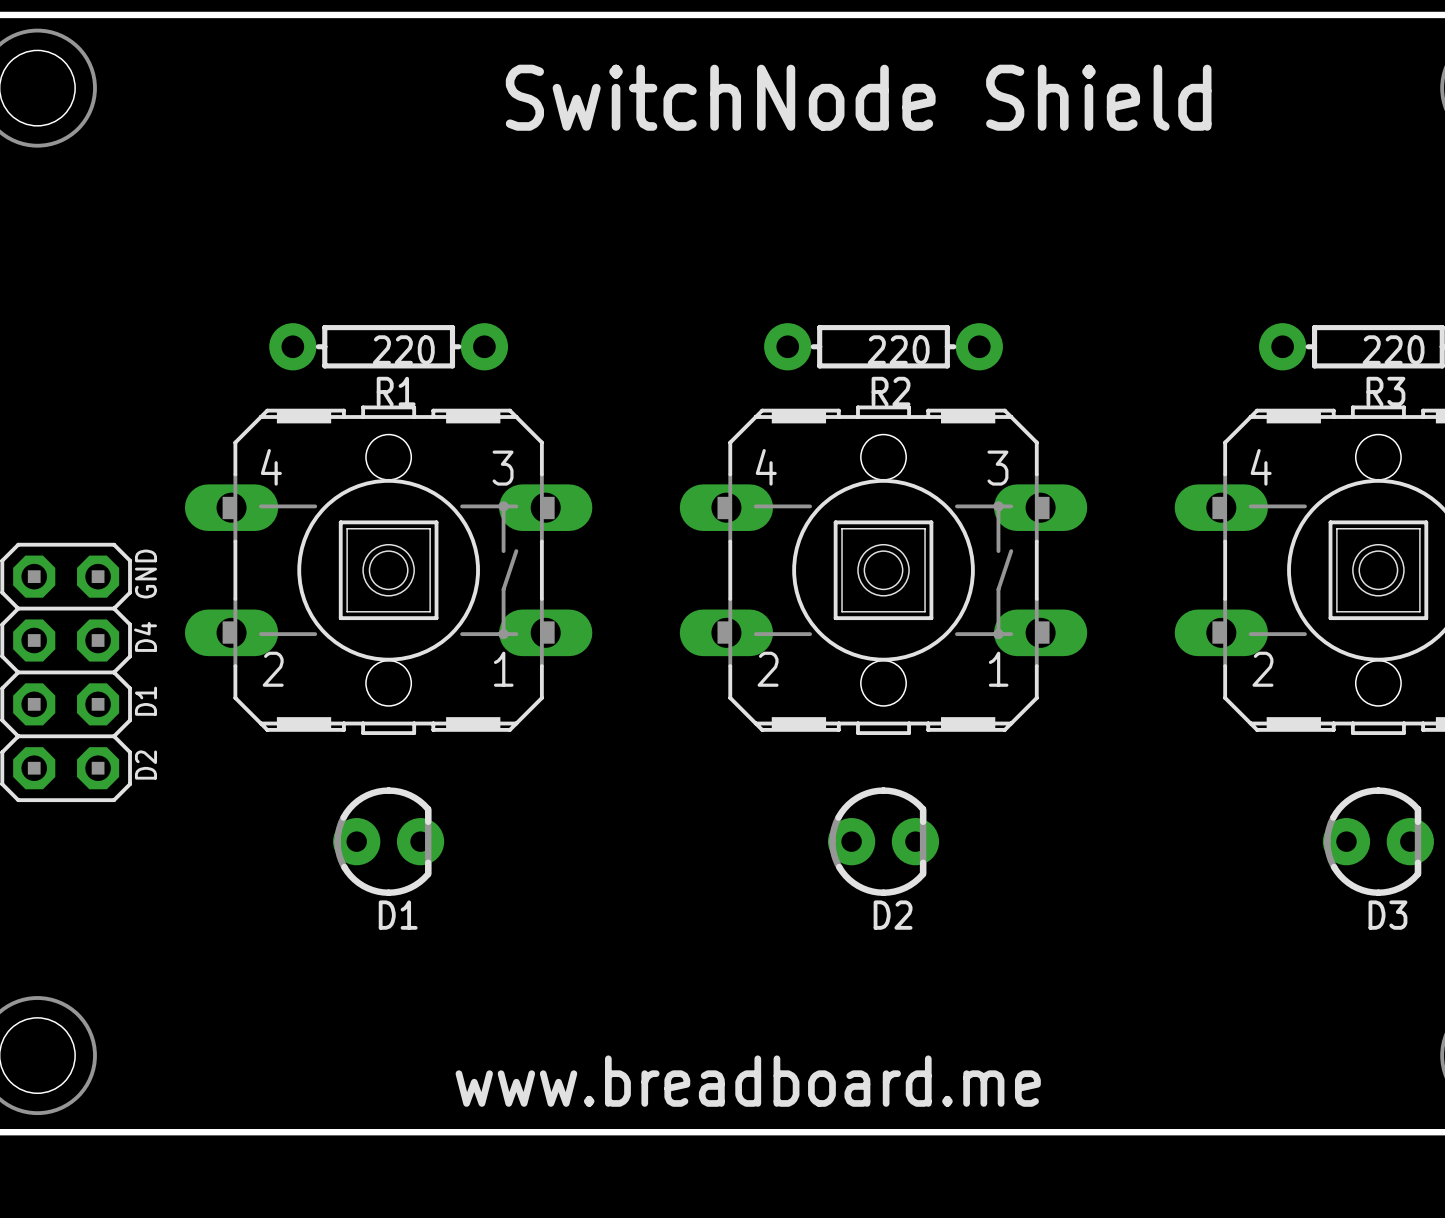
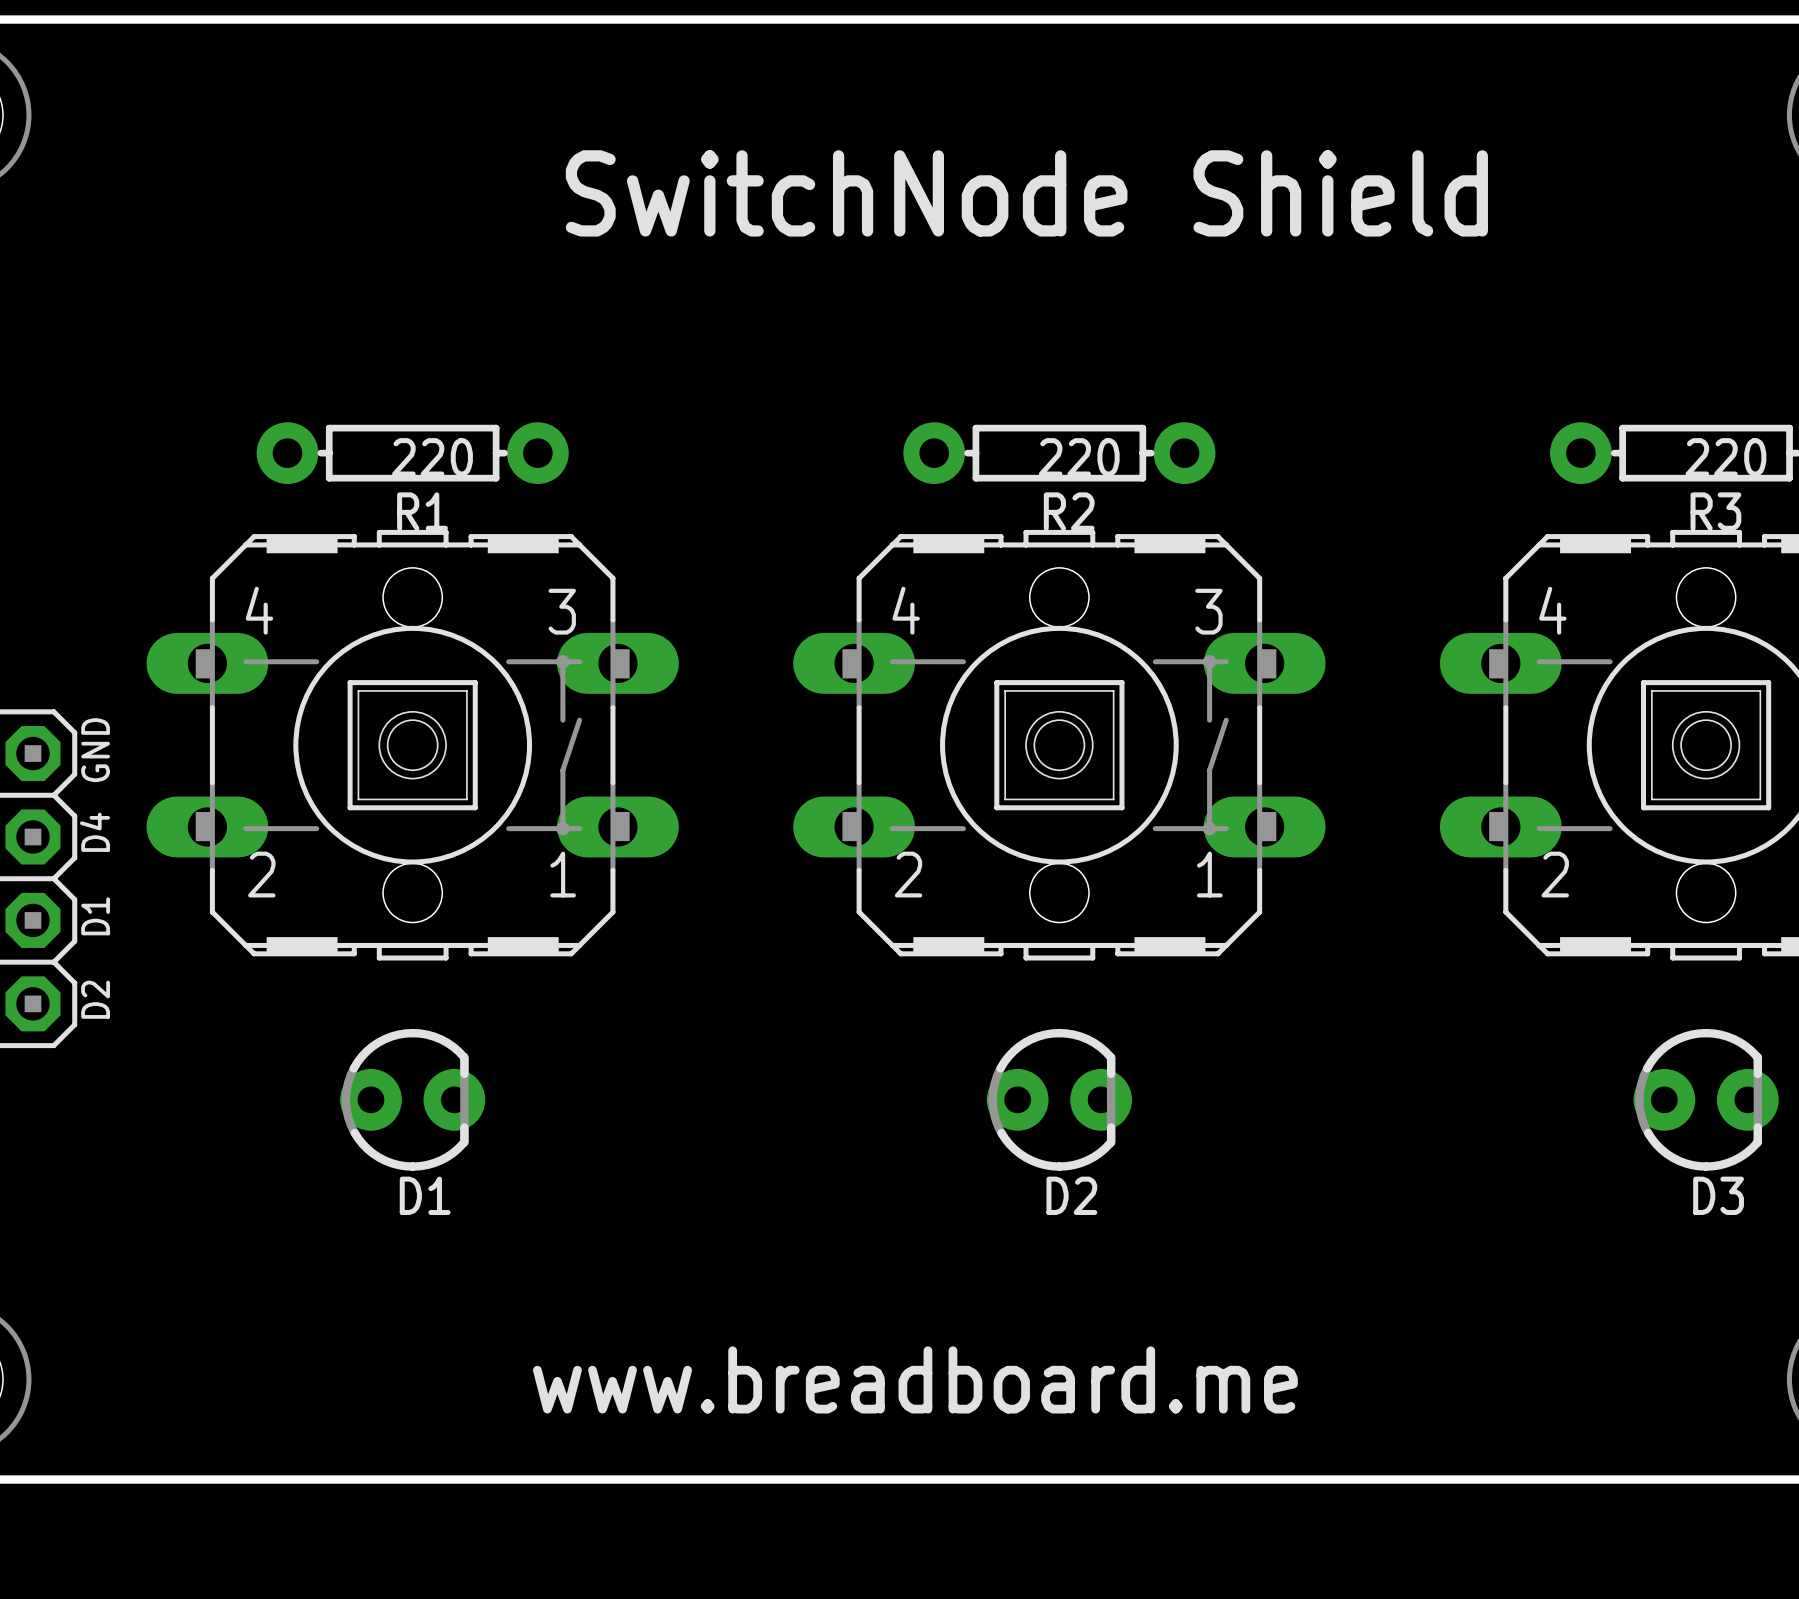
text position: SwitchNode Shield (858, 97) -> SwitchNode Shield (1026, 193)
text position: www.breadboard.me (748, 1081) -> www.breadboard.me (915, 1379)

